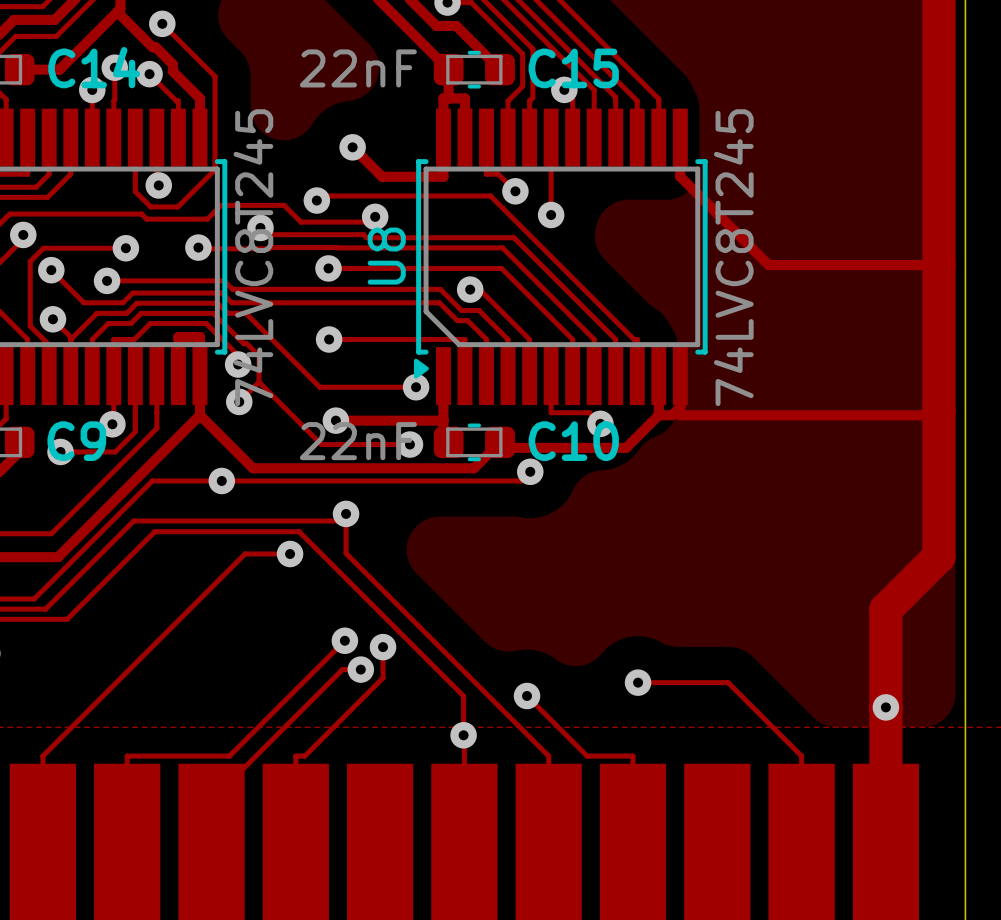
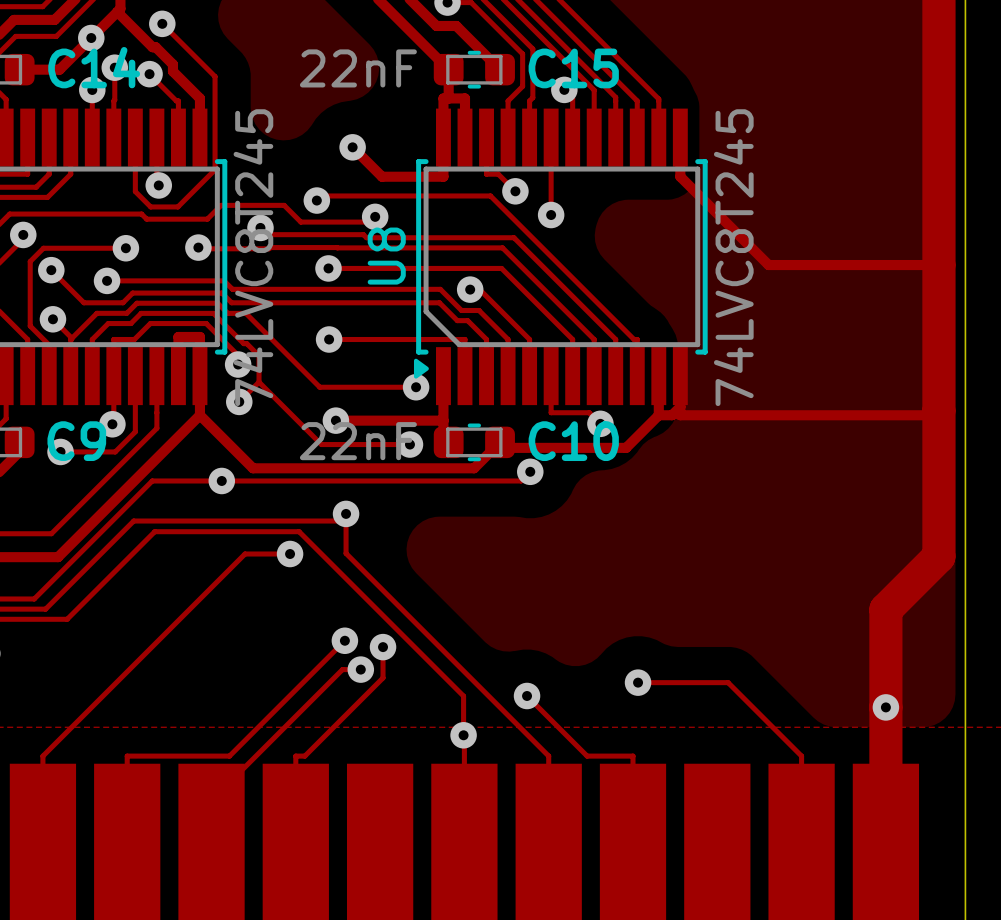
via: none -> (91, 38)

